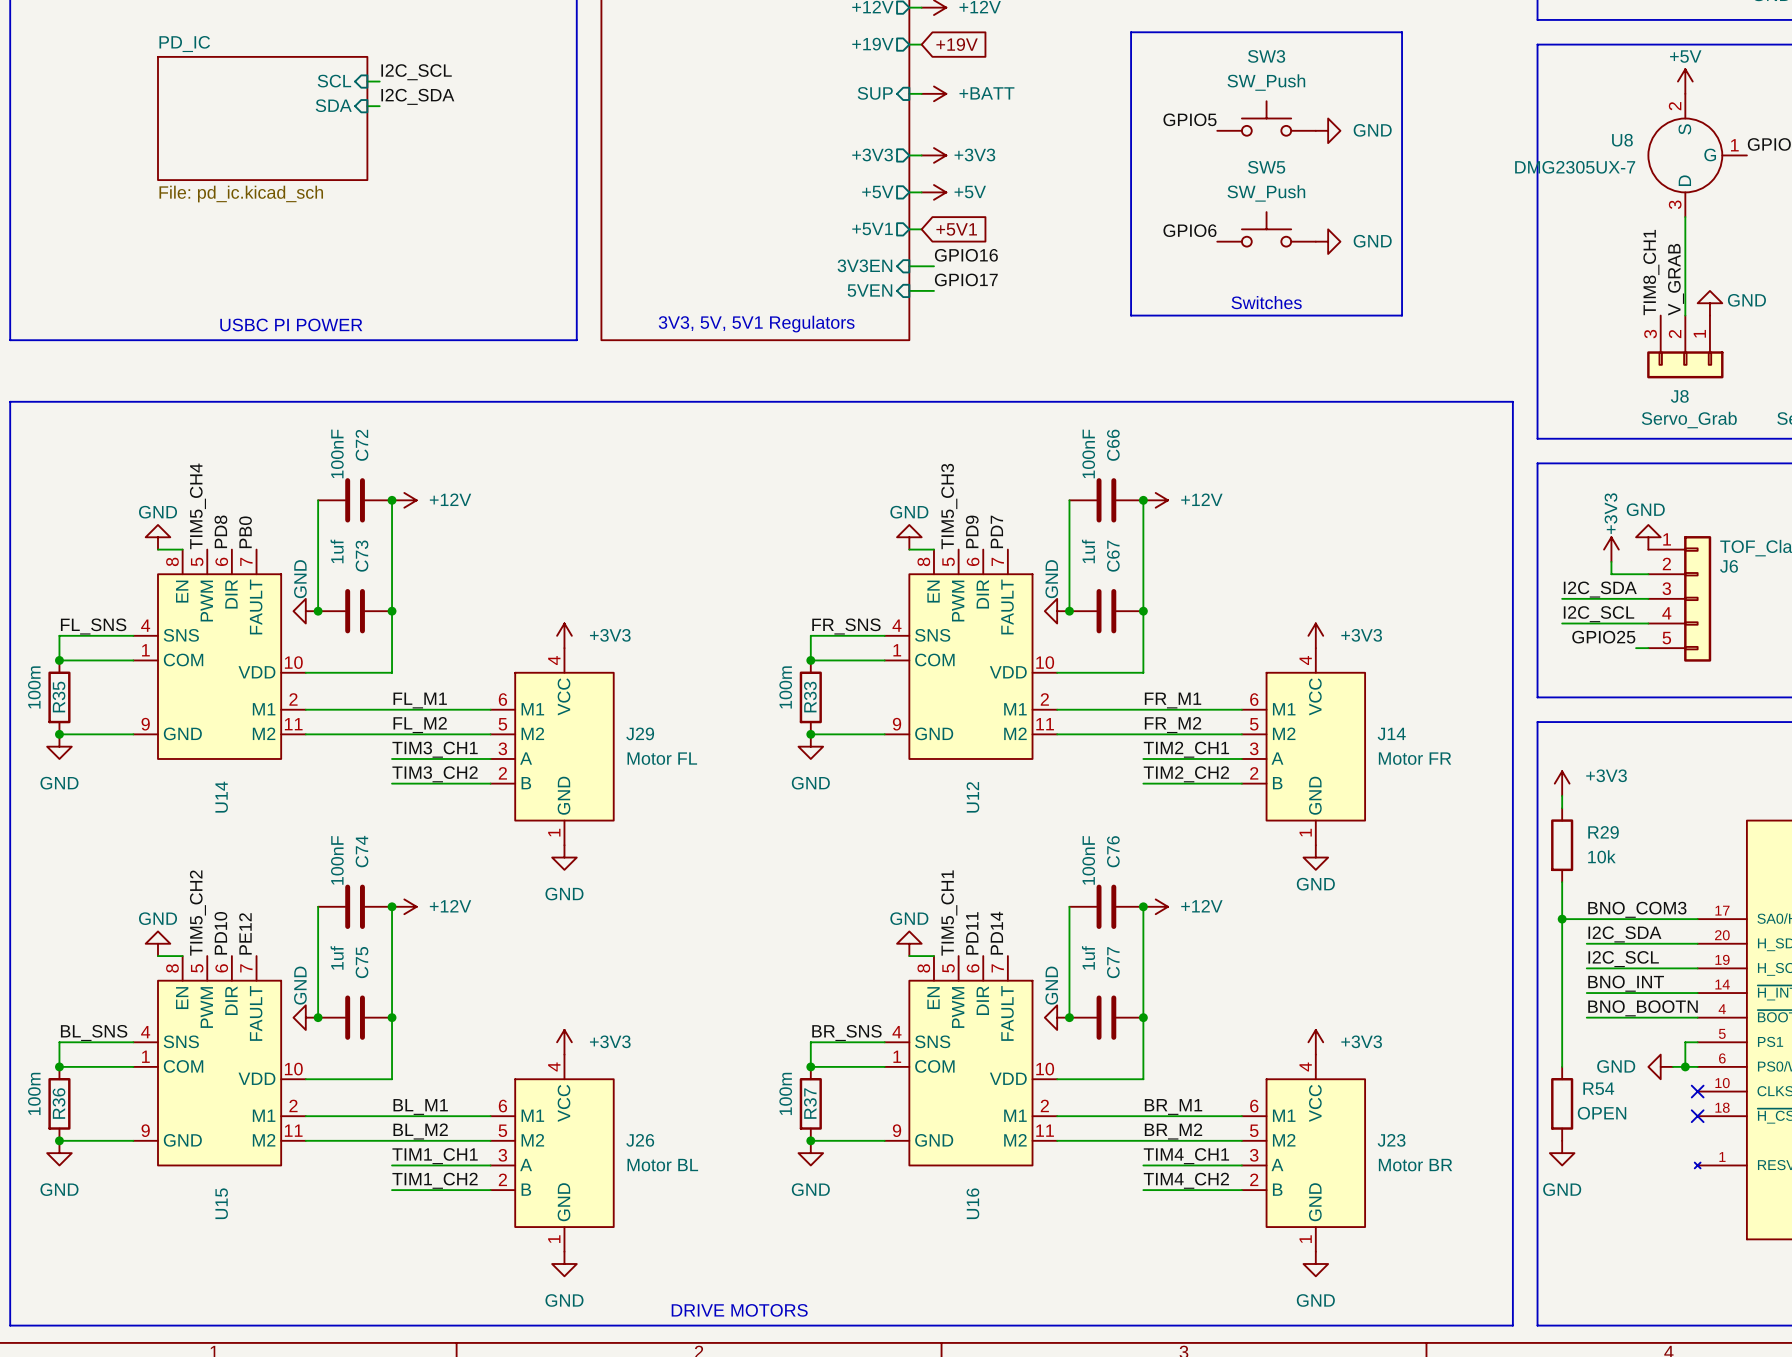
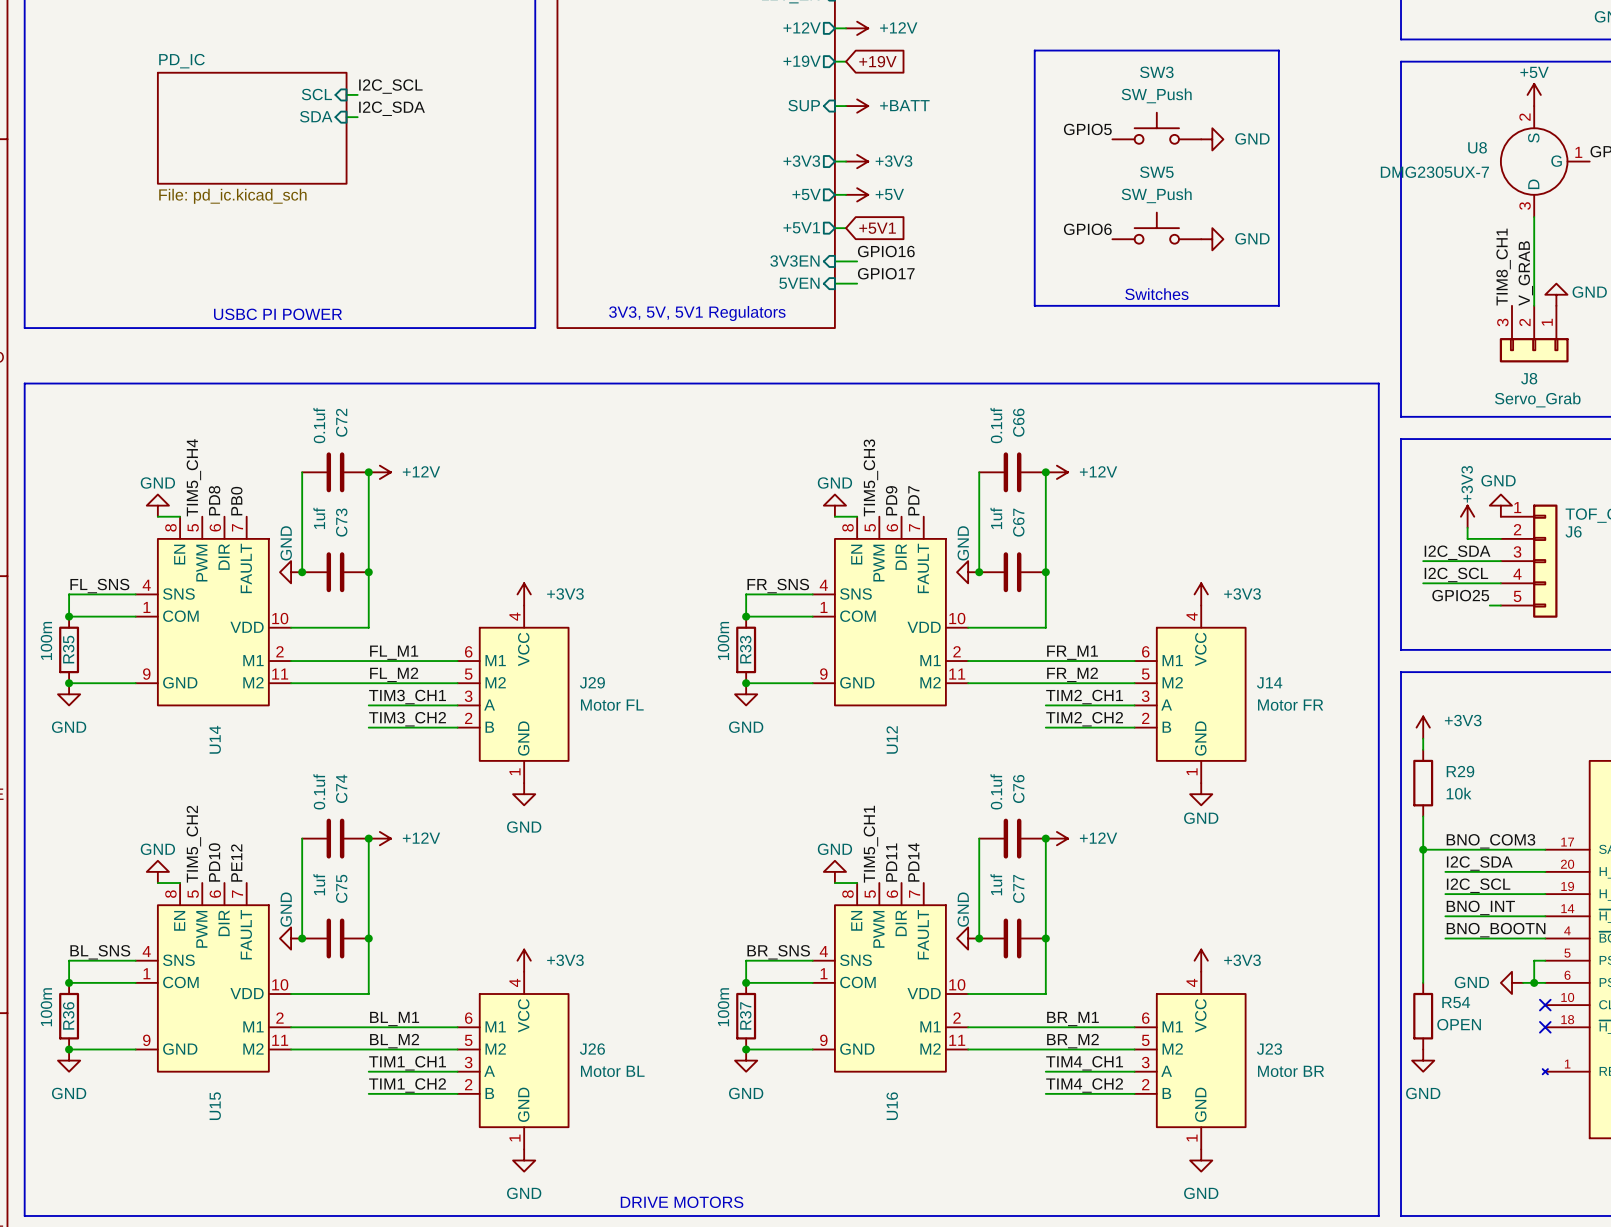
C72 value: 100nF (337, 453) -> 0.1uf (319, 425)
C66 value: 100nF (1088, 453) -> 0.1uf (996, 425)
C74 value: 100nF (337, 860) -> 0.1uf (319, 791)
C76 value: 100nF (1088, 860) -> 0.1uf (996, 791)

